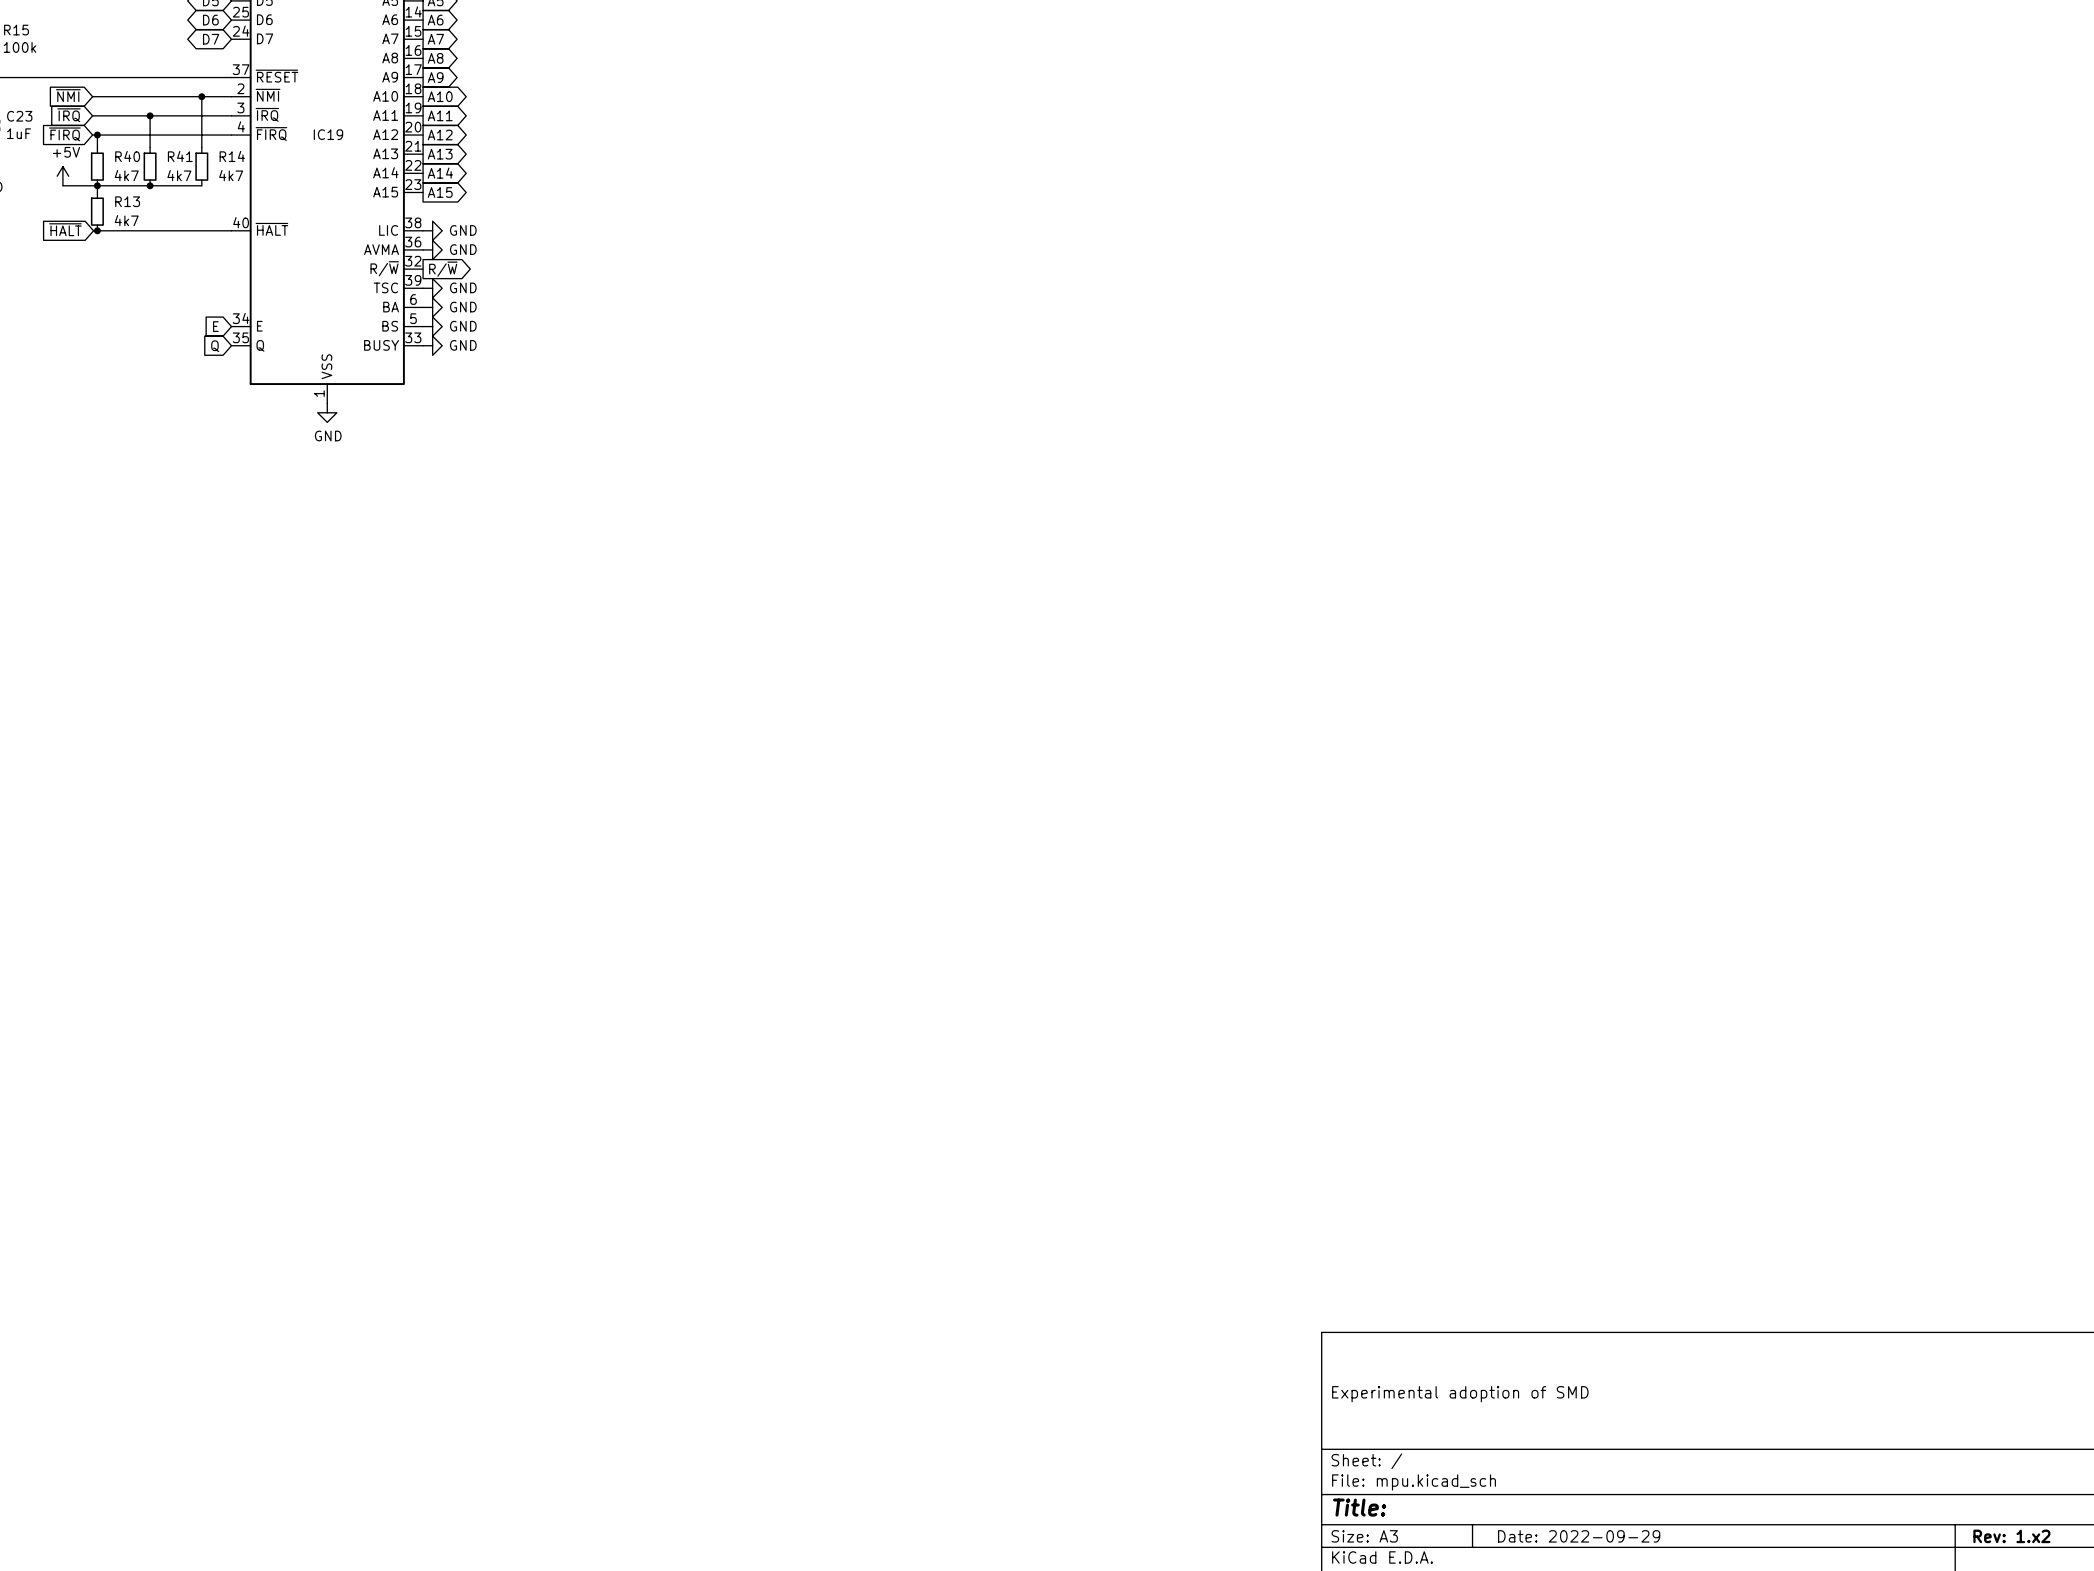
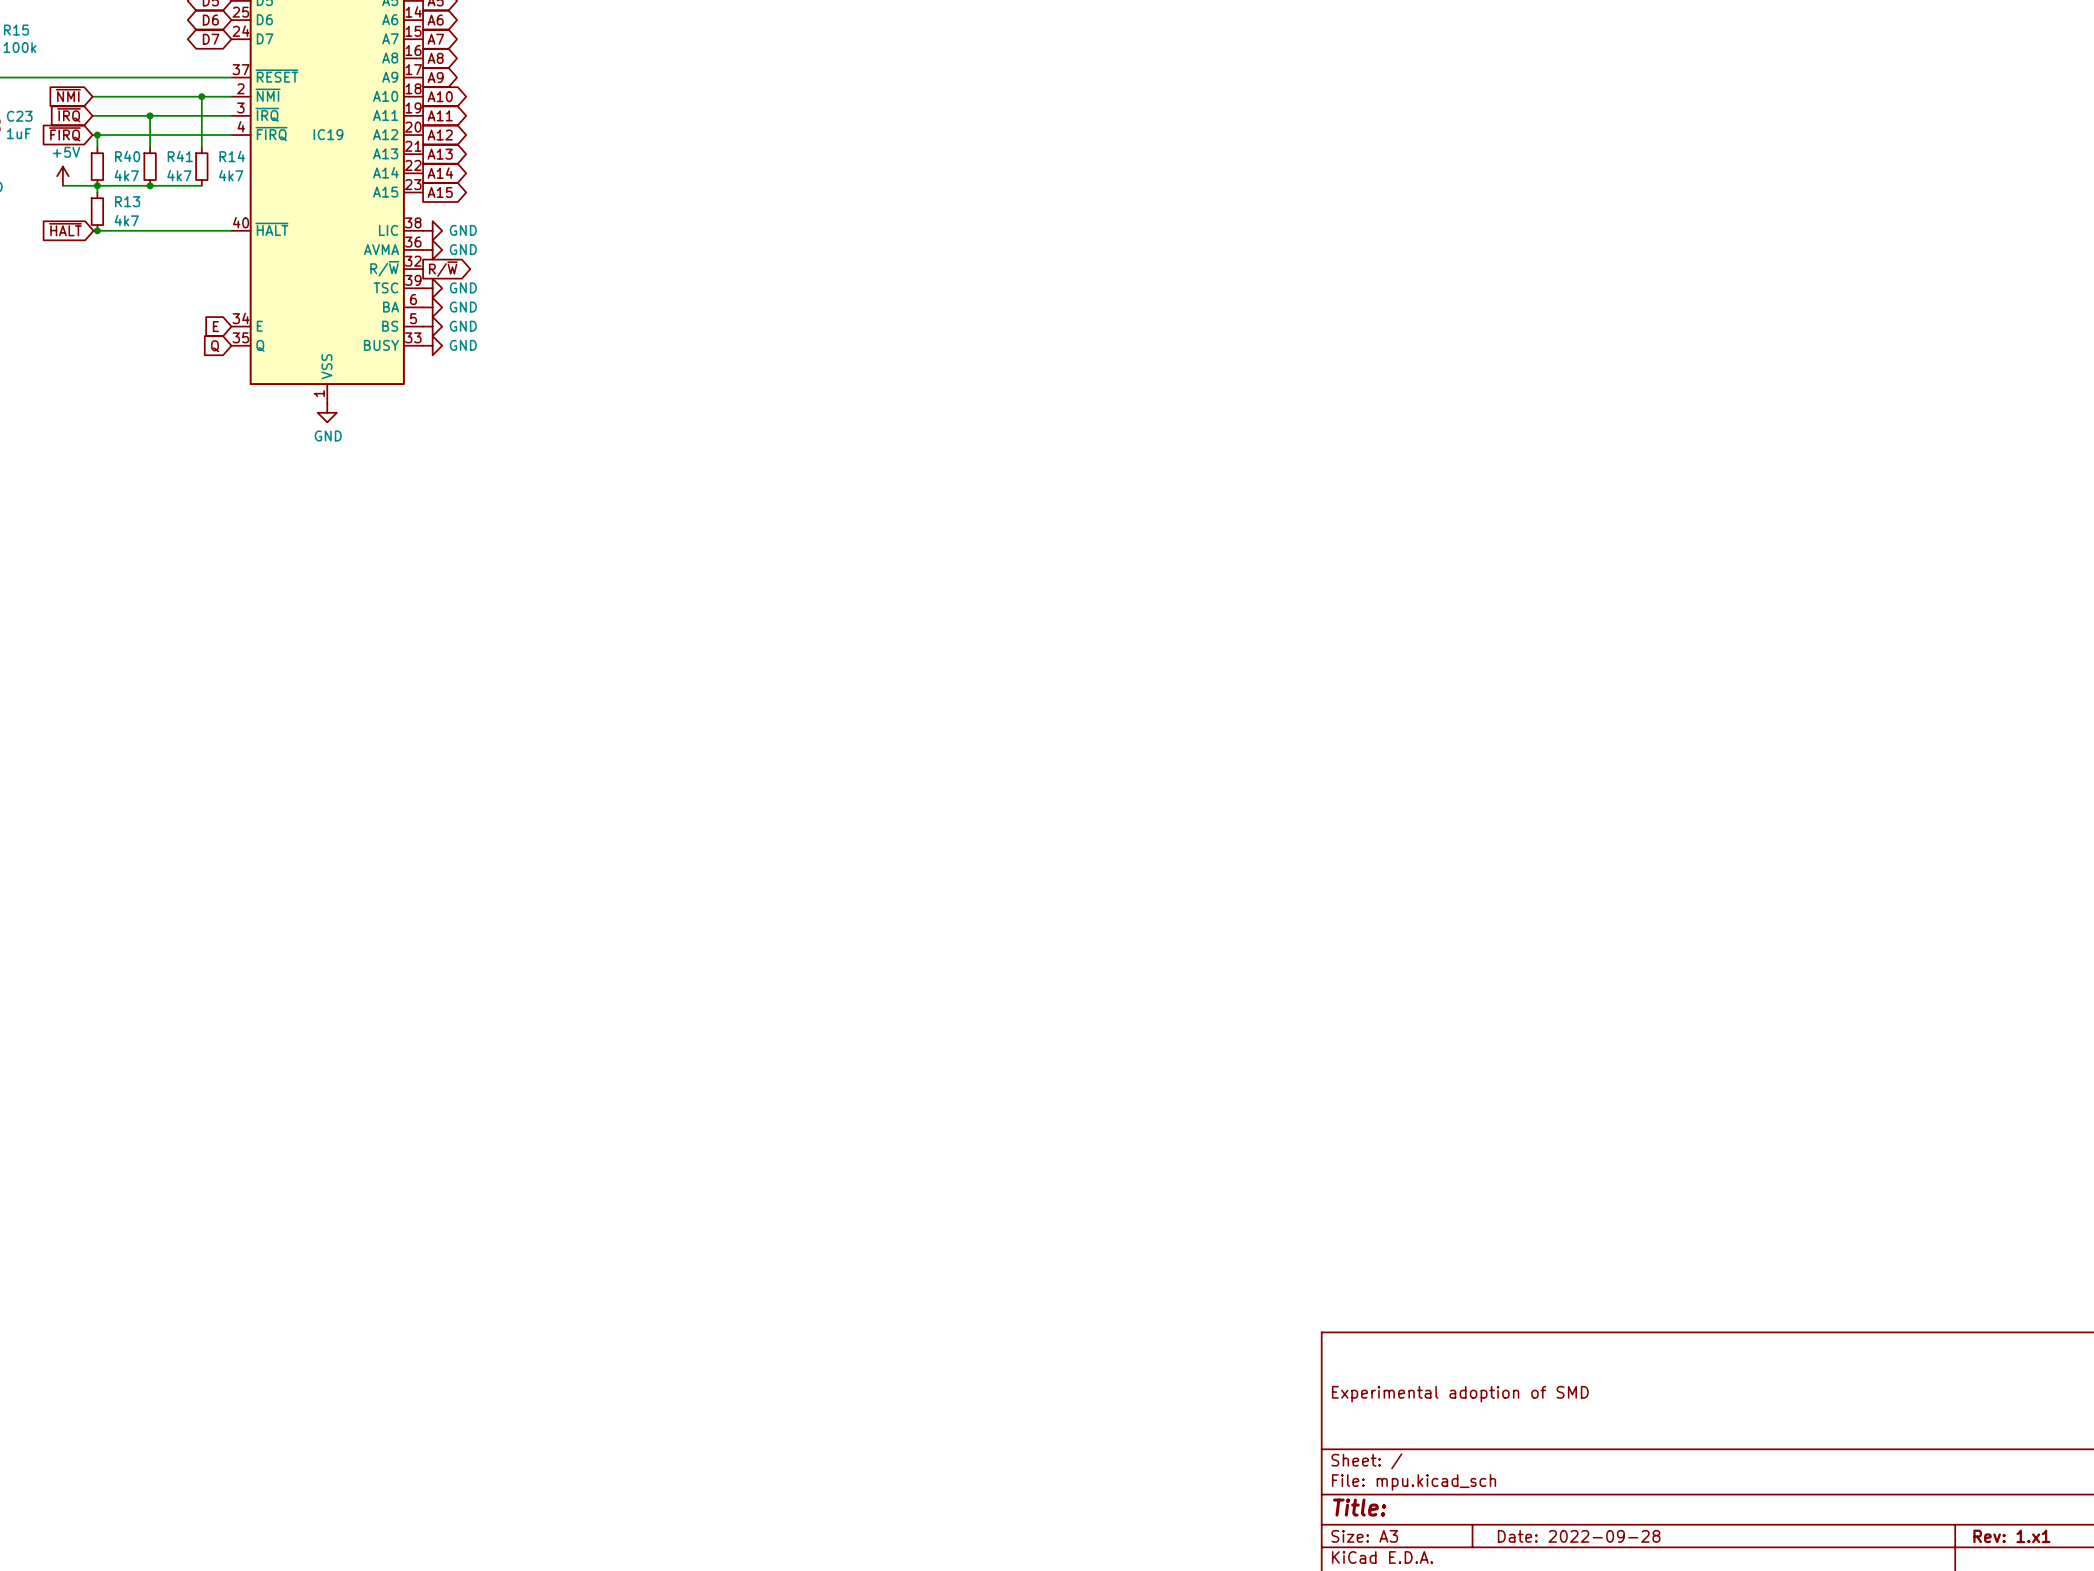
title block: Date: 2022-09-29 (1579, 1536) -> Date: 2022-09-28 (1579, 1536)
title block: Rev: 1.x2 (2011, 1536) -> Rev: 1.x1 (2011, 1536)

